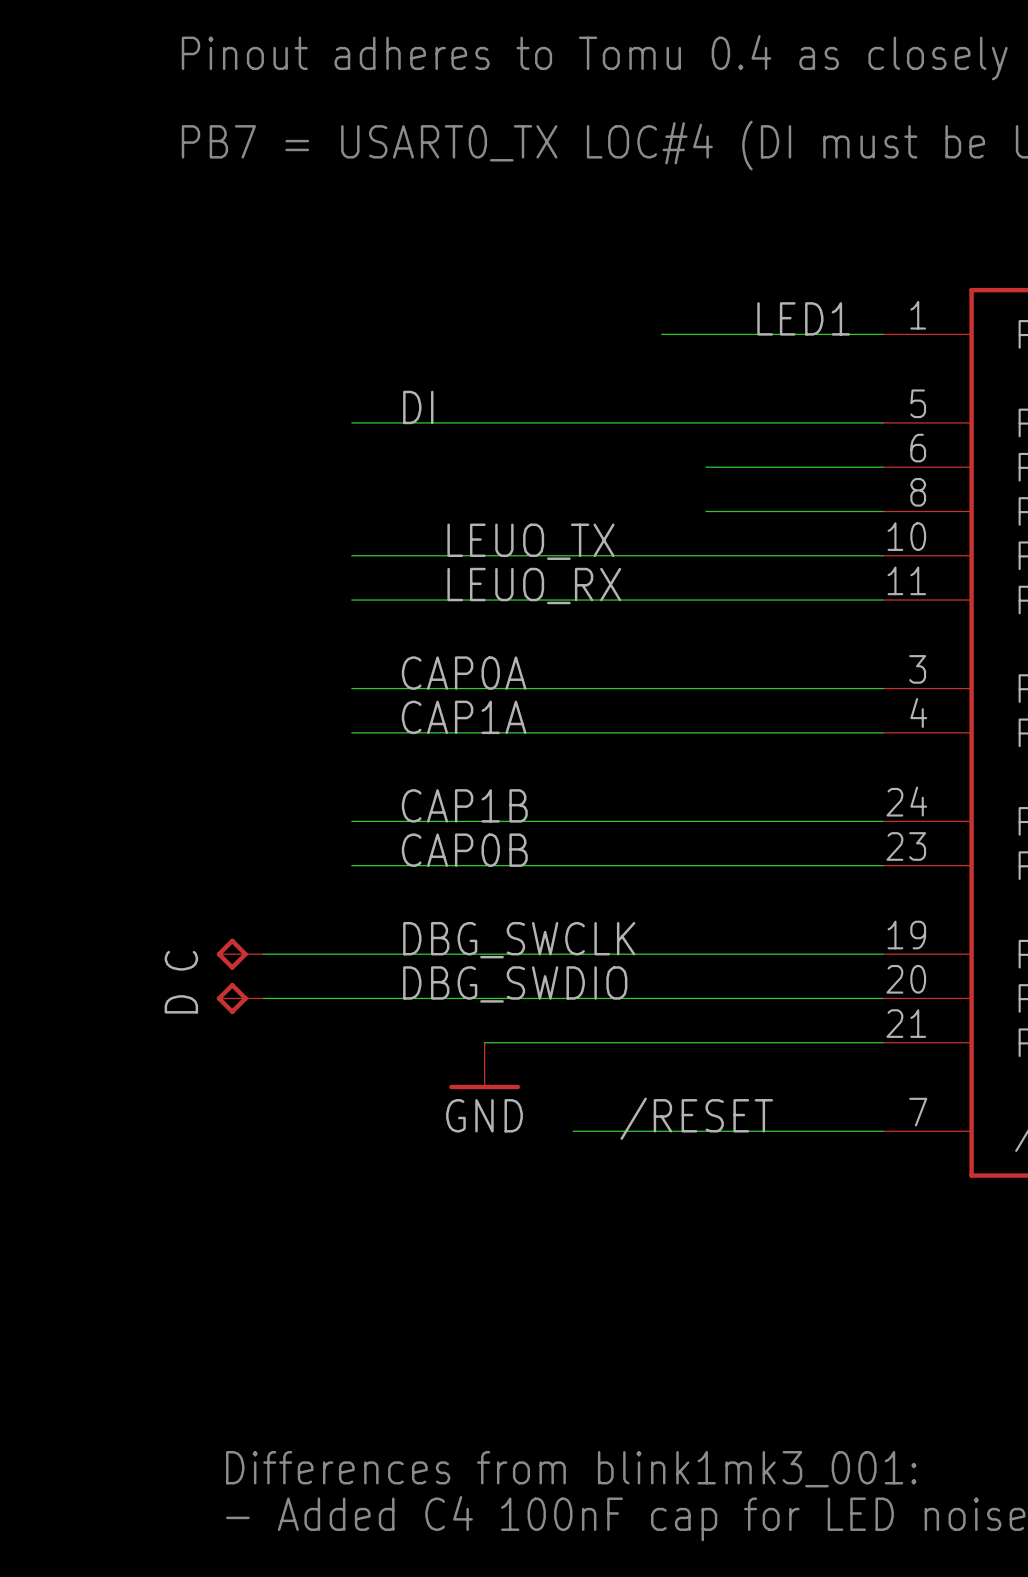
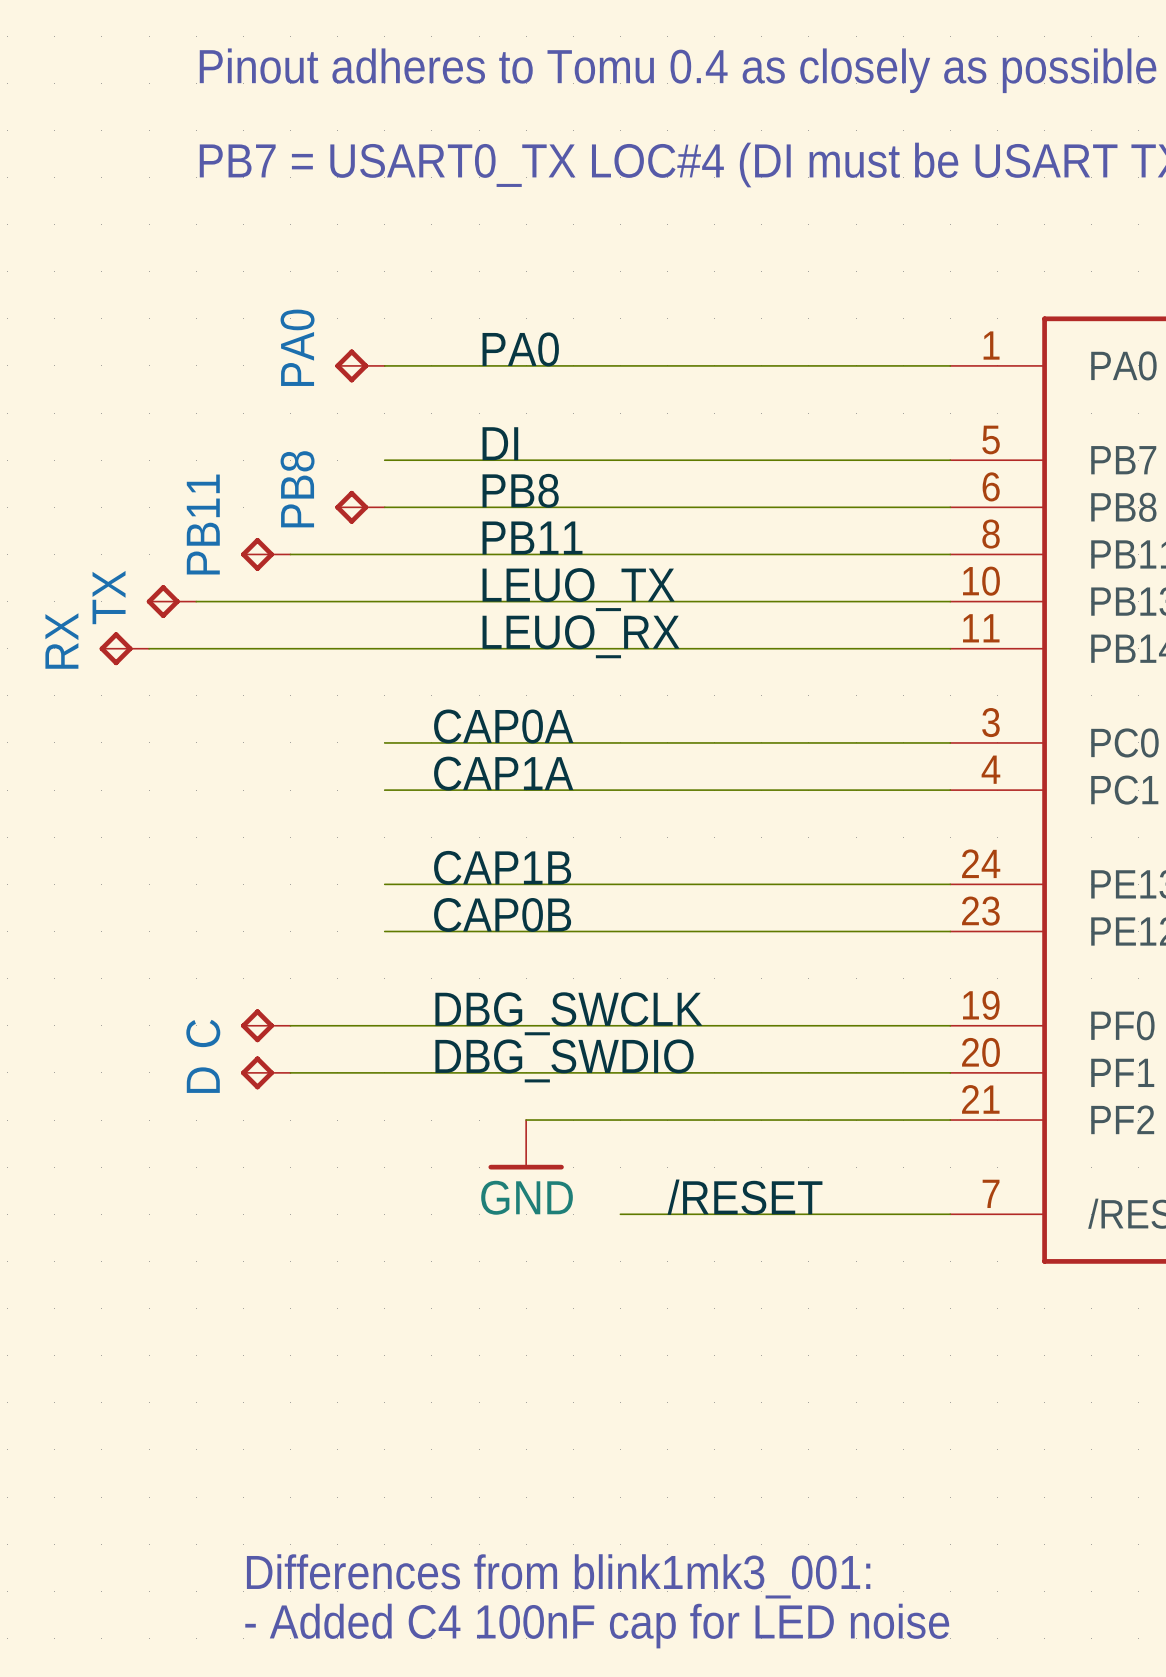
label: none -> PA0 (520, 349)
label: LED1 (803, 318) -> none
PA0: none -> (360, 365)
wire: none -> (384, 365) (714, 365)
label position: DI (418, 407) -> DI (500, 443)
label: none -> PB8 (520, 490)
PB8: none -> (360, 507)
wire: none -> (384, 507) (761, 507)
label: none -> PB11 (532, 537)
PB11: none -> (265, 554)
wire: none -> (290, 554) (761, 554)
TX: none -> (171, 601)
wire: none -> (196, 601) (384, 601)
RX: none -> (124, 648)
wire: none -> (149, 648) (384, 648)

